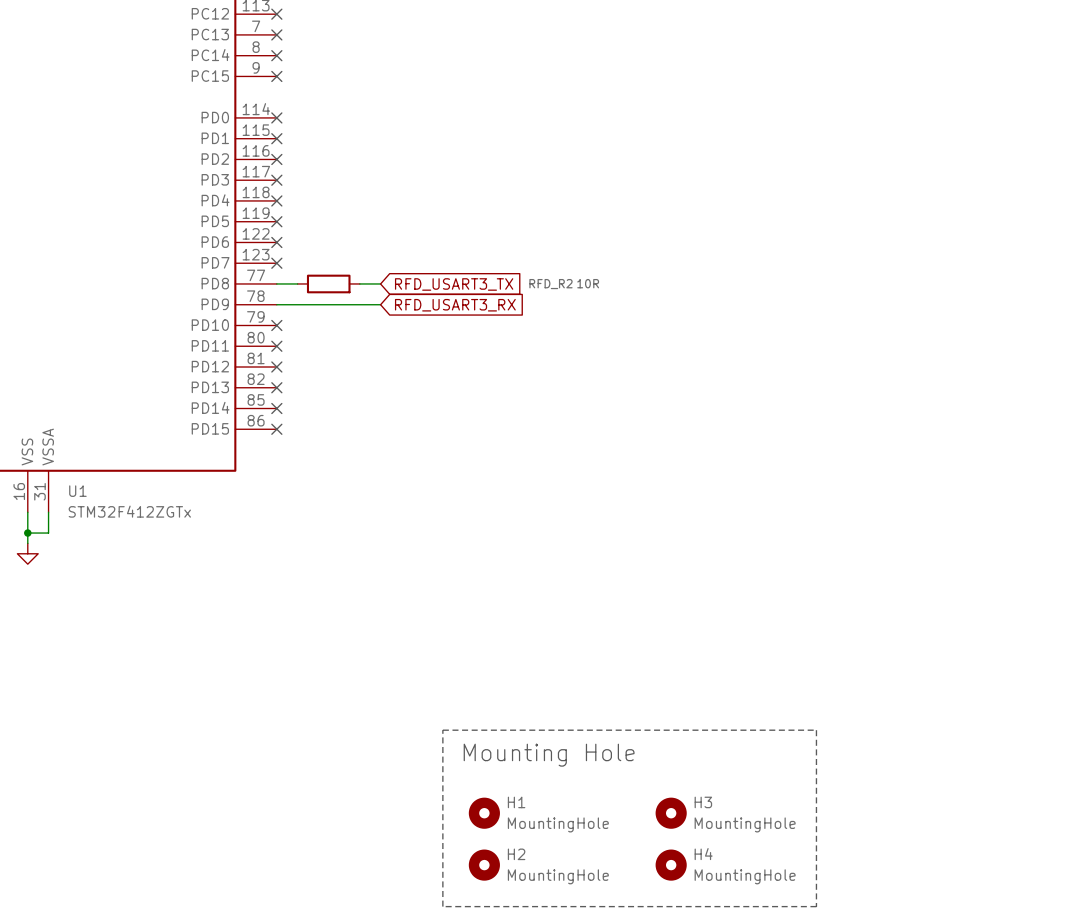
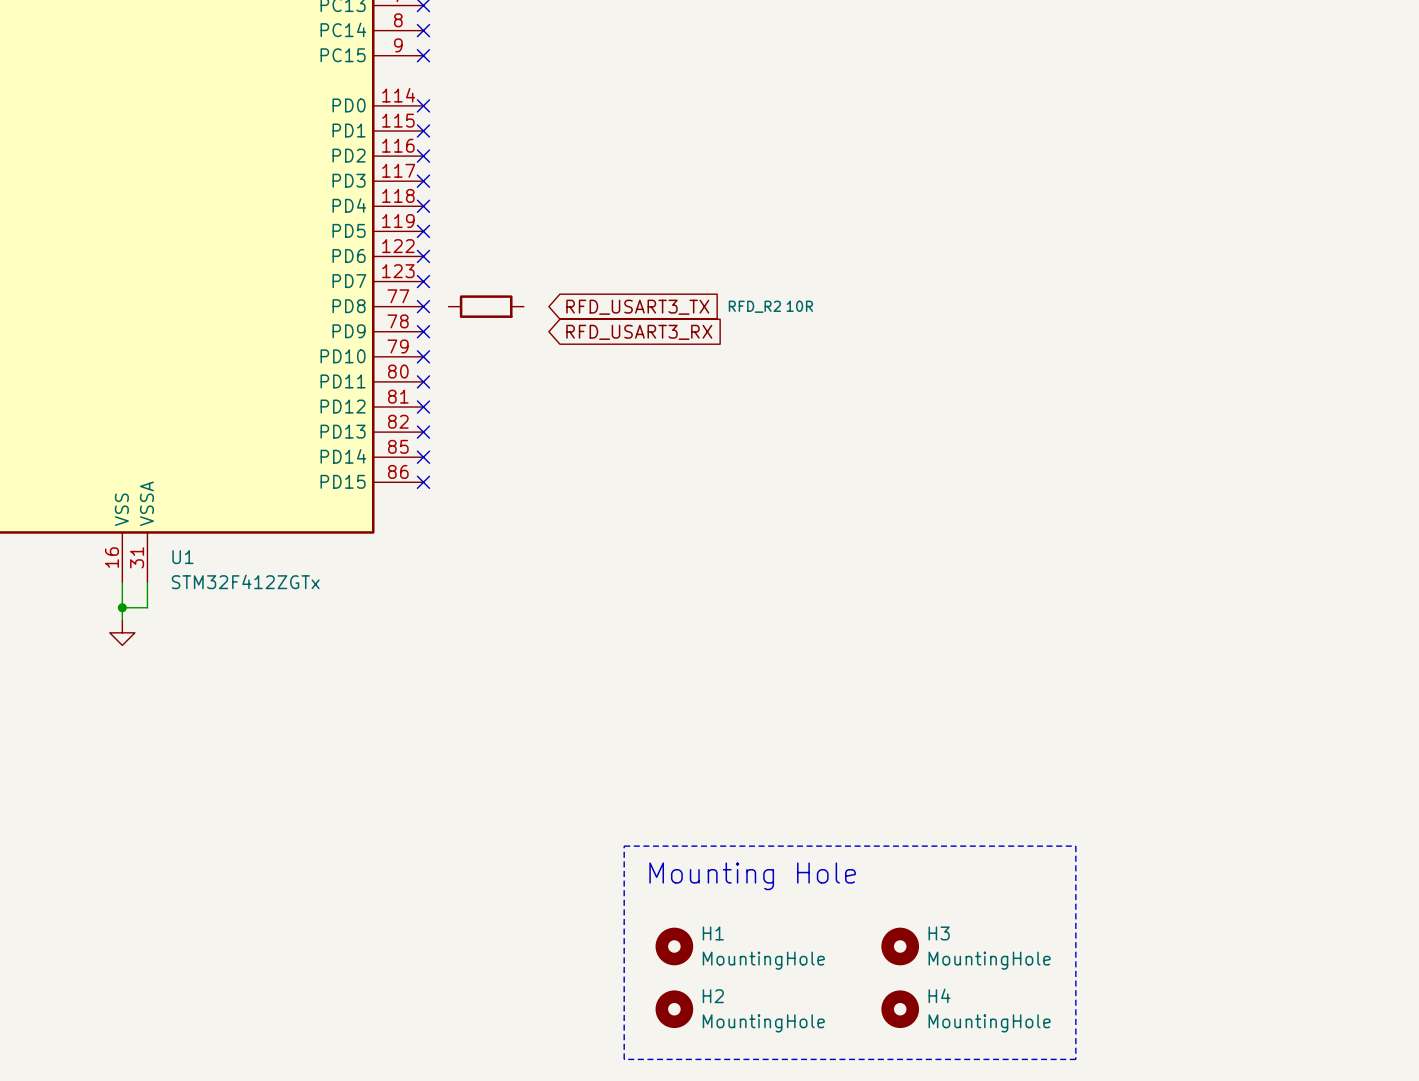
wire: (276, 283) (297, 283) -> none
no-connect mark: none -> (423, 306)
wire: (359, 283) (380, 283) -> none
wire: (276, 304) (380, 304) -> none
no-connect mark: none -> (423, 331)

